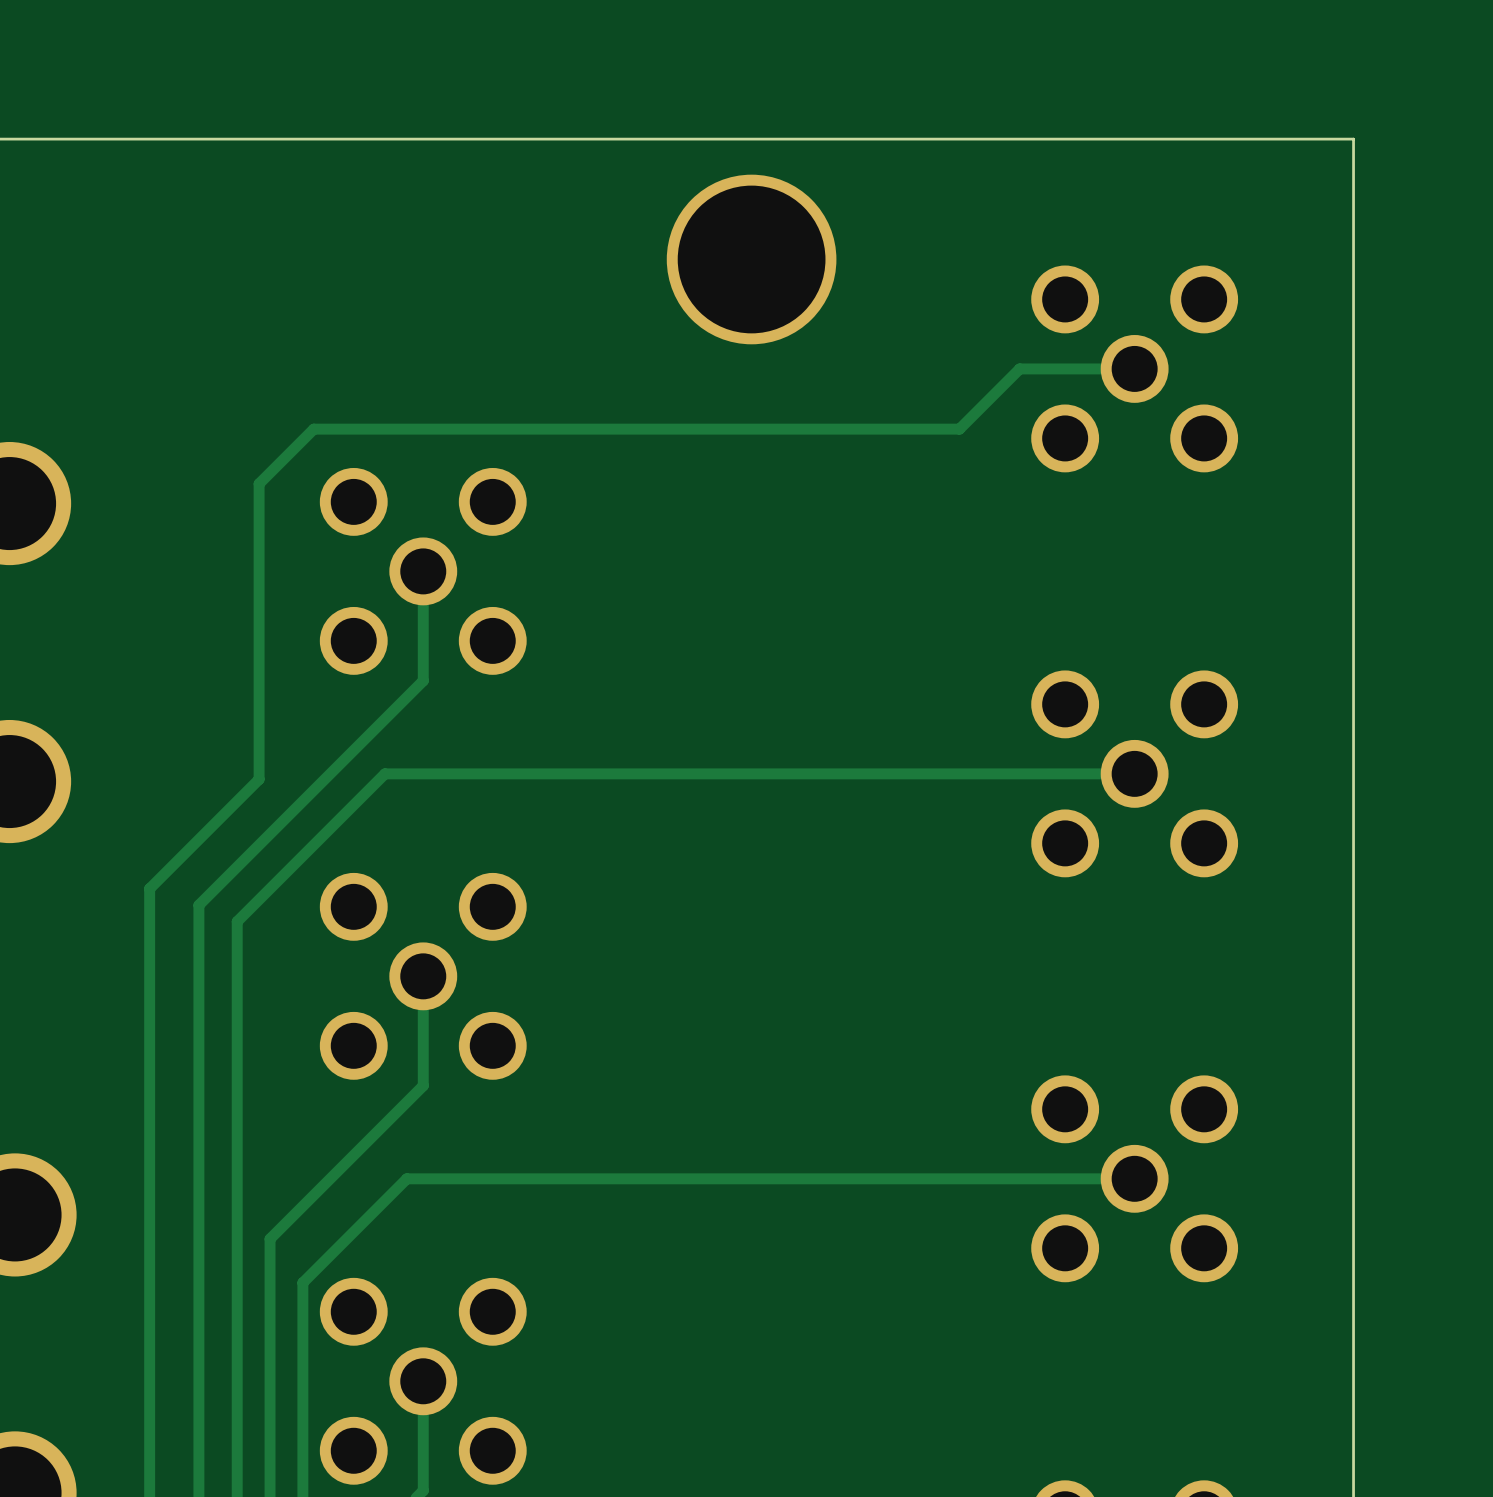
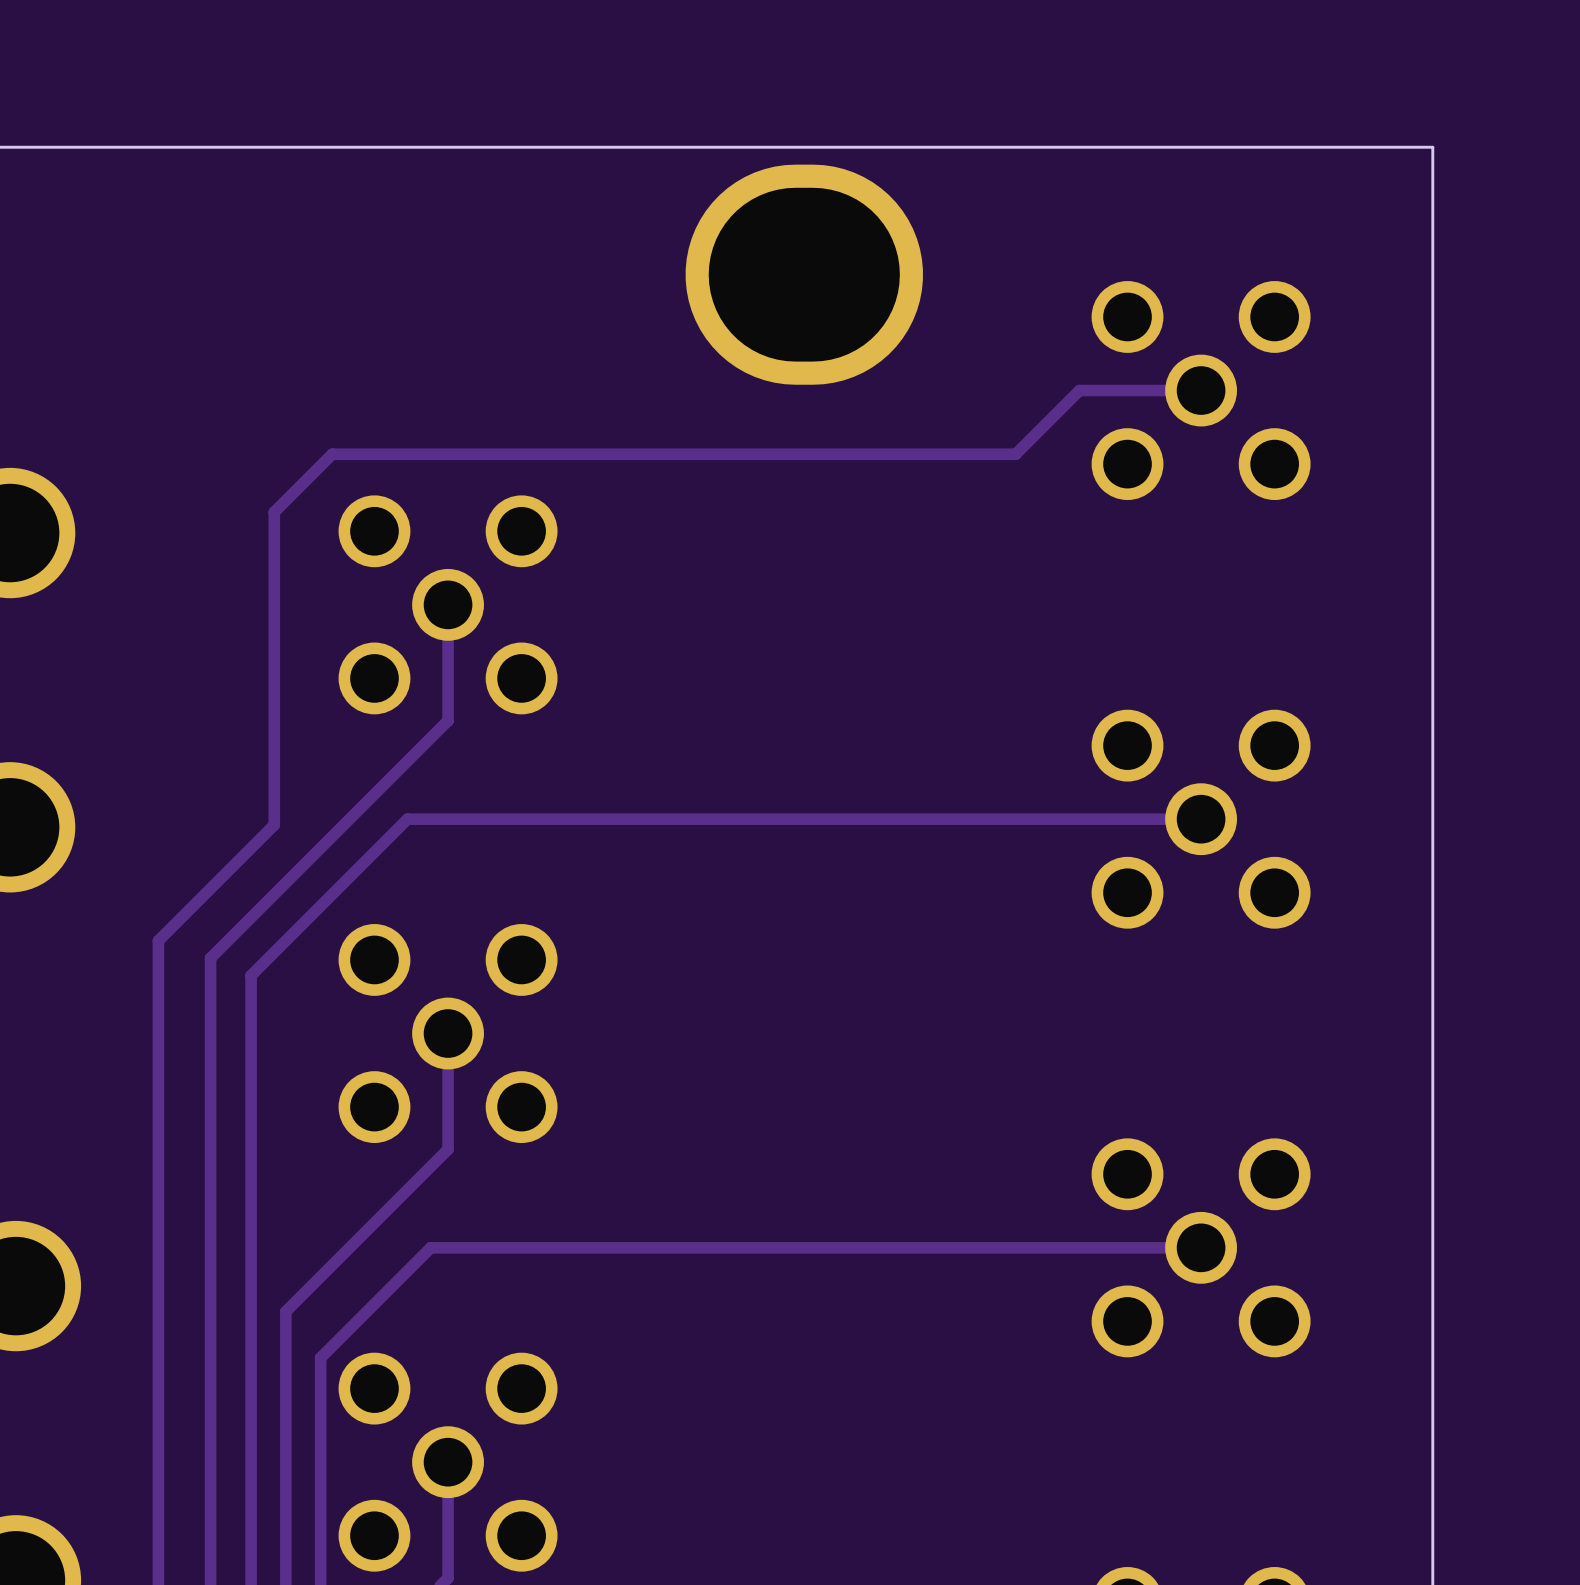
part footprint: [666, 174, 837, 345] -> [685, 164, 924, 385]

